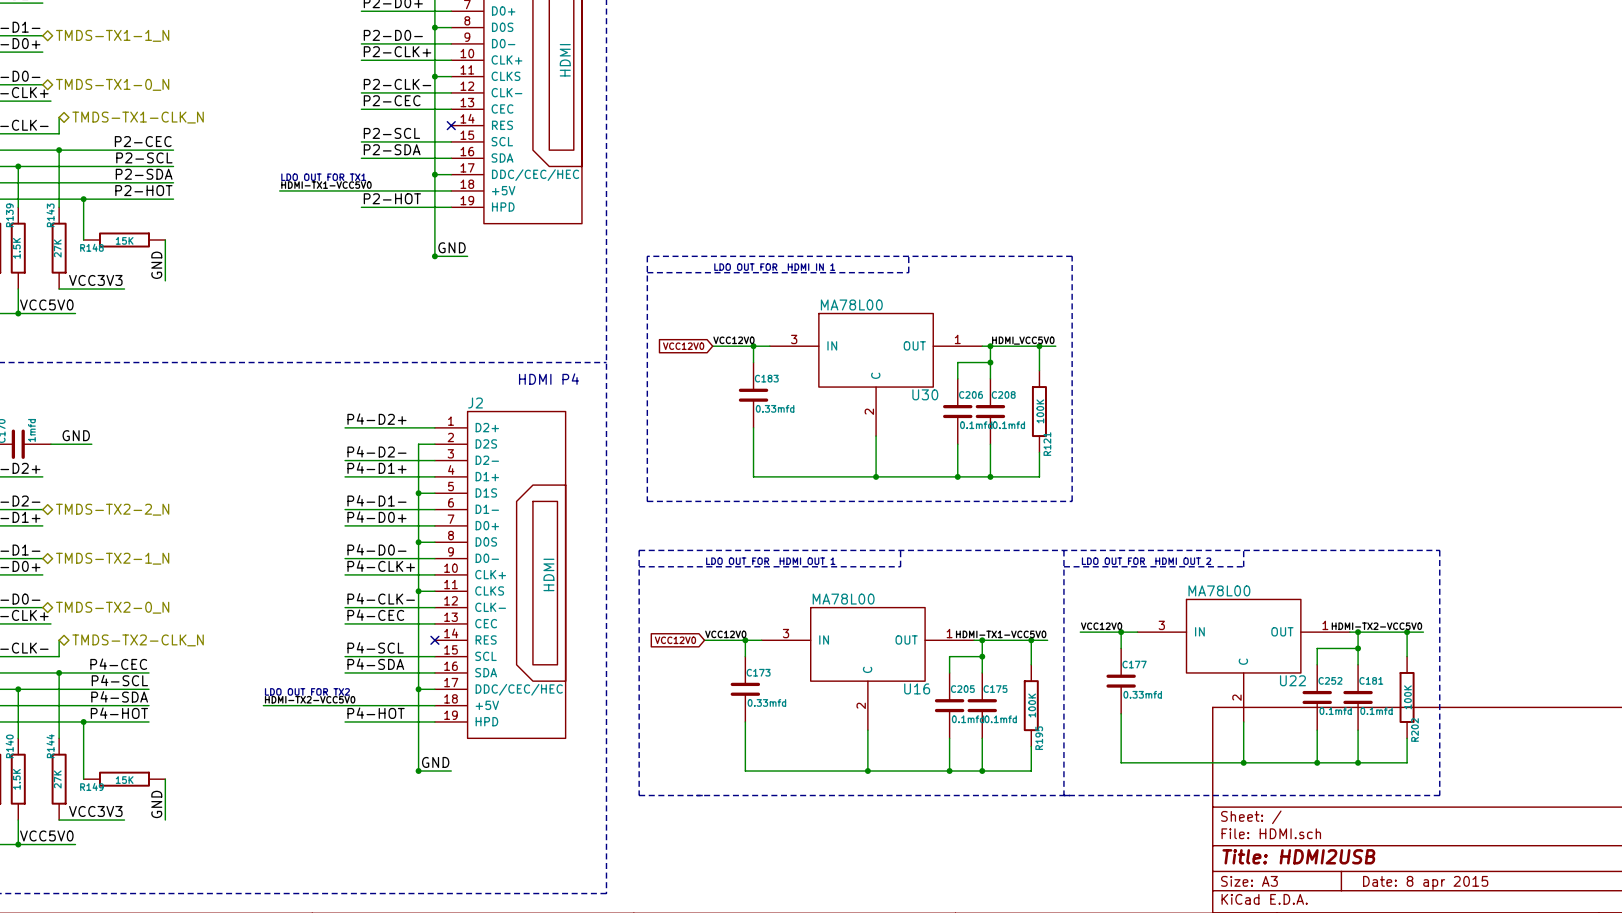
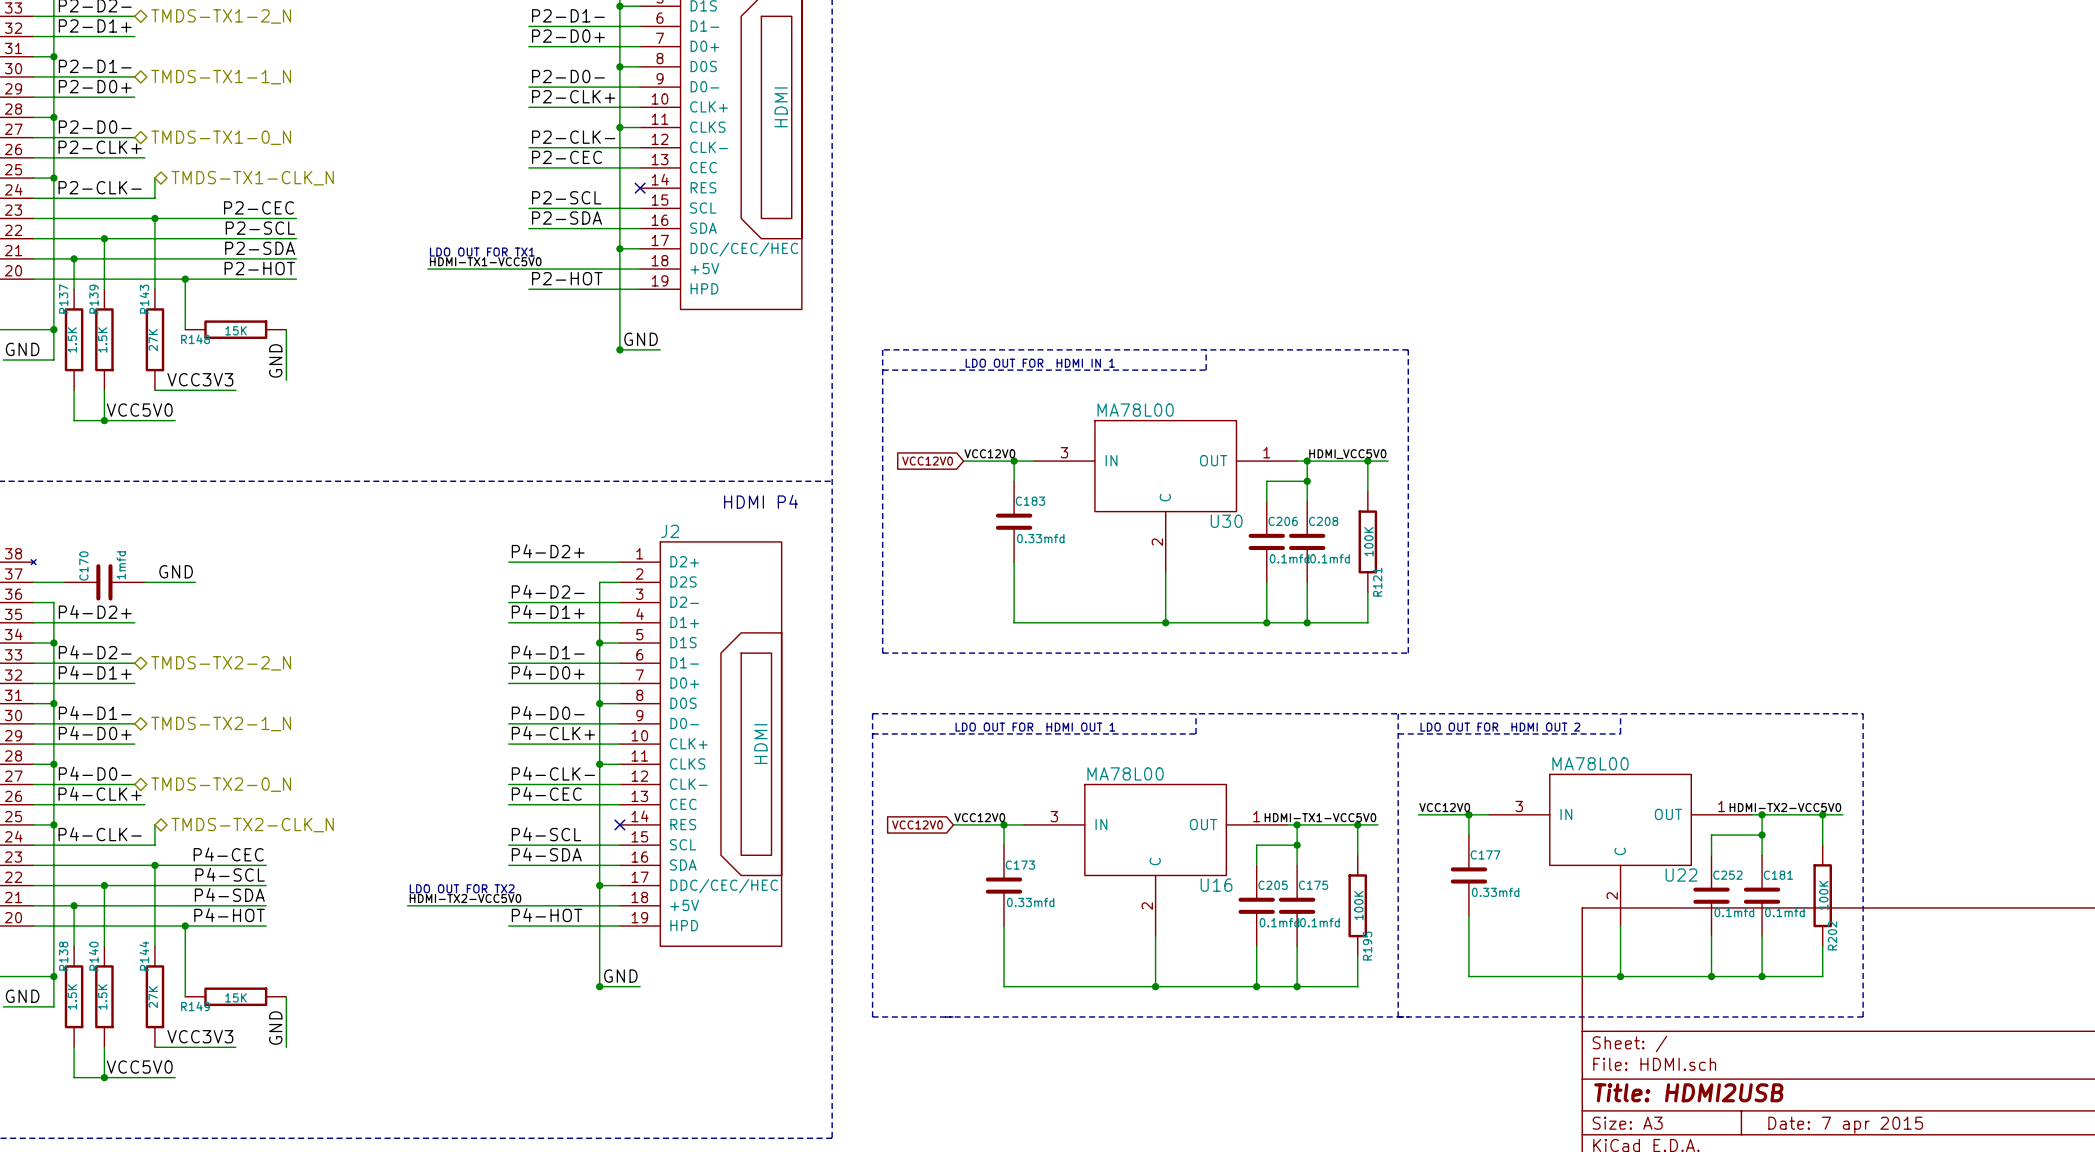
title block: Date: 8 apr 2015 (1425, 882) -> Date: 7 apr 2015 (1845, 1125)

